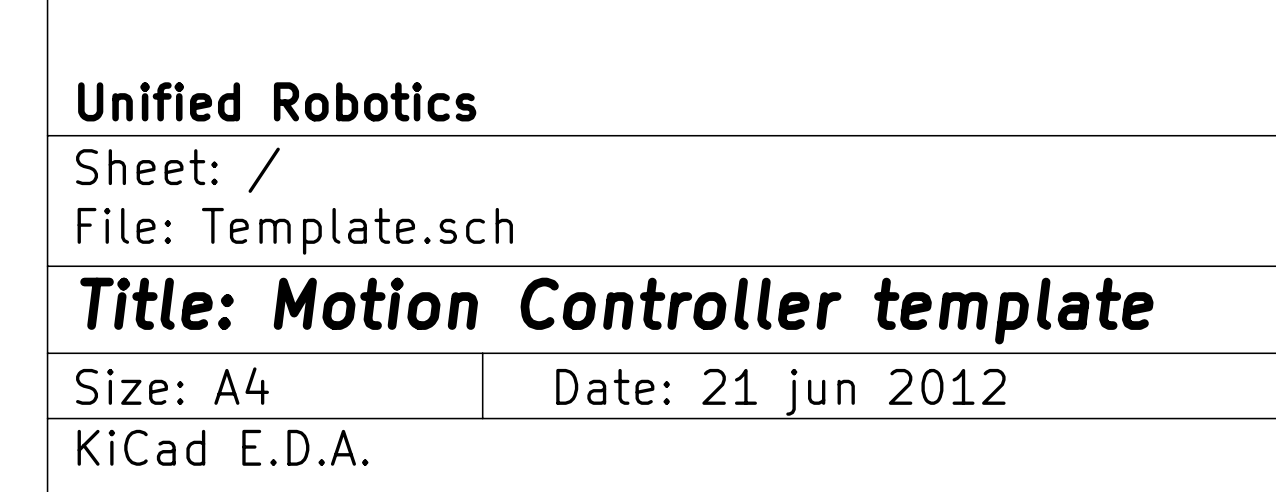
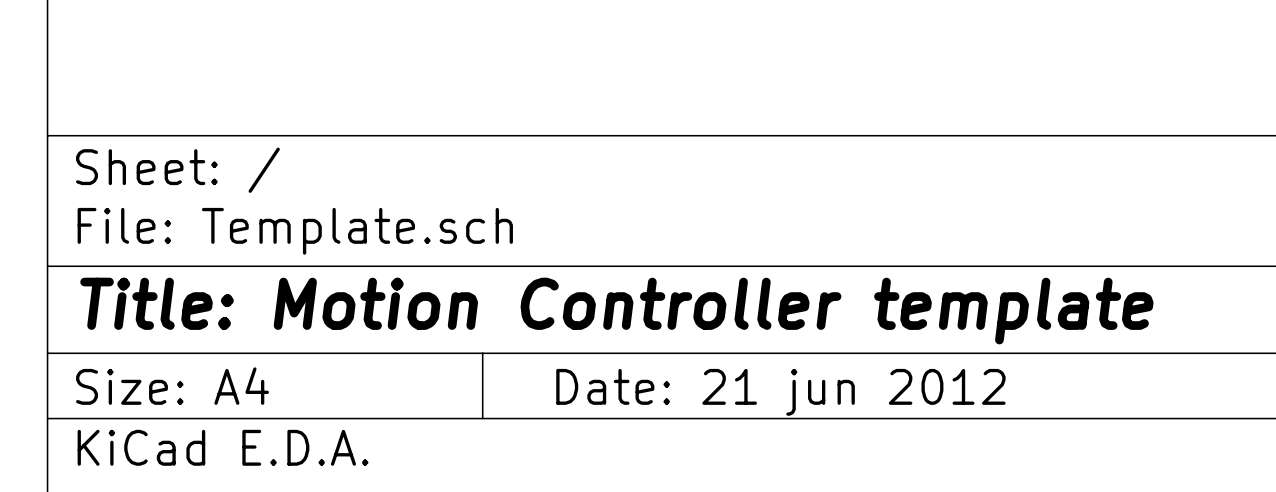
title block: Unified Robotics (277, 101) -> none

